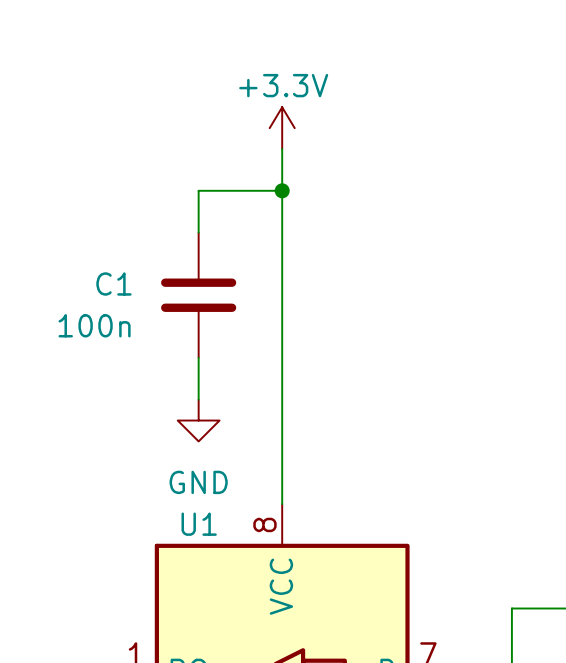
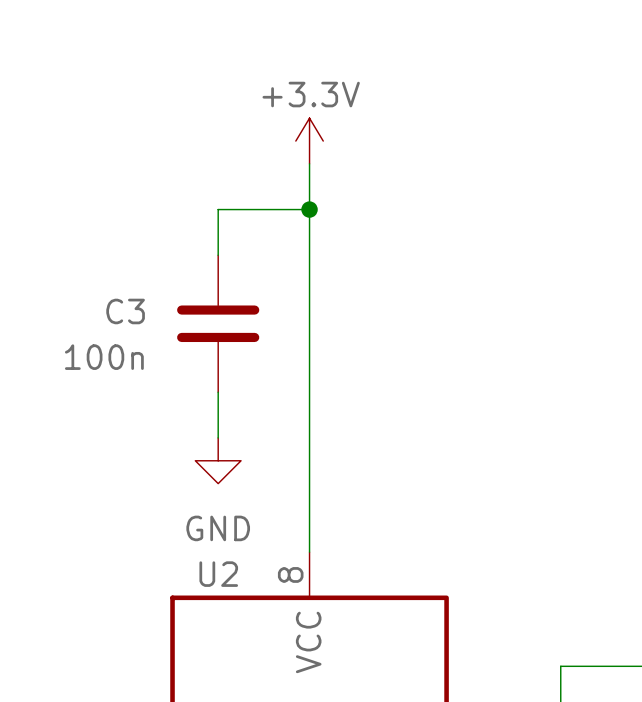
C1 name: C1 (113, 284) -> C3 (125, 311)
U1 name: U1 (199, 524) -> U2 (218, 574)

